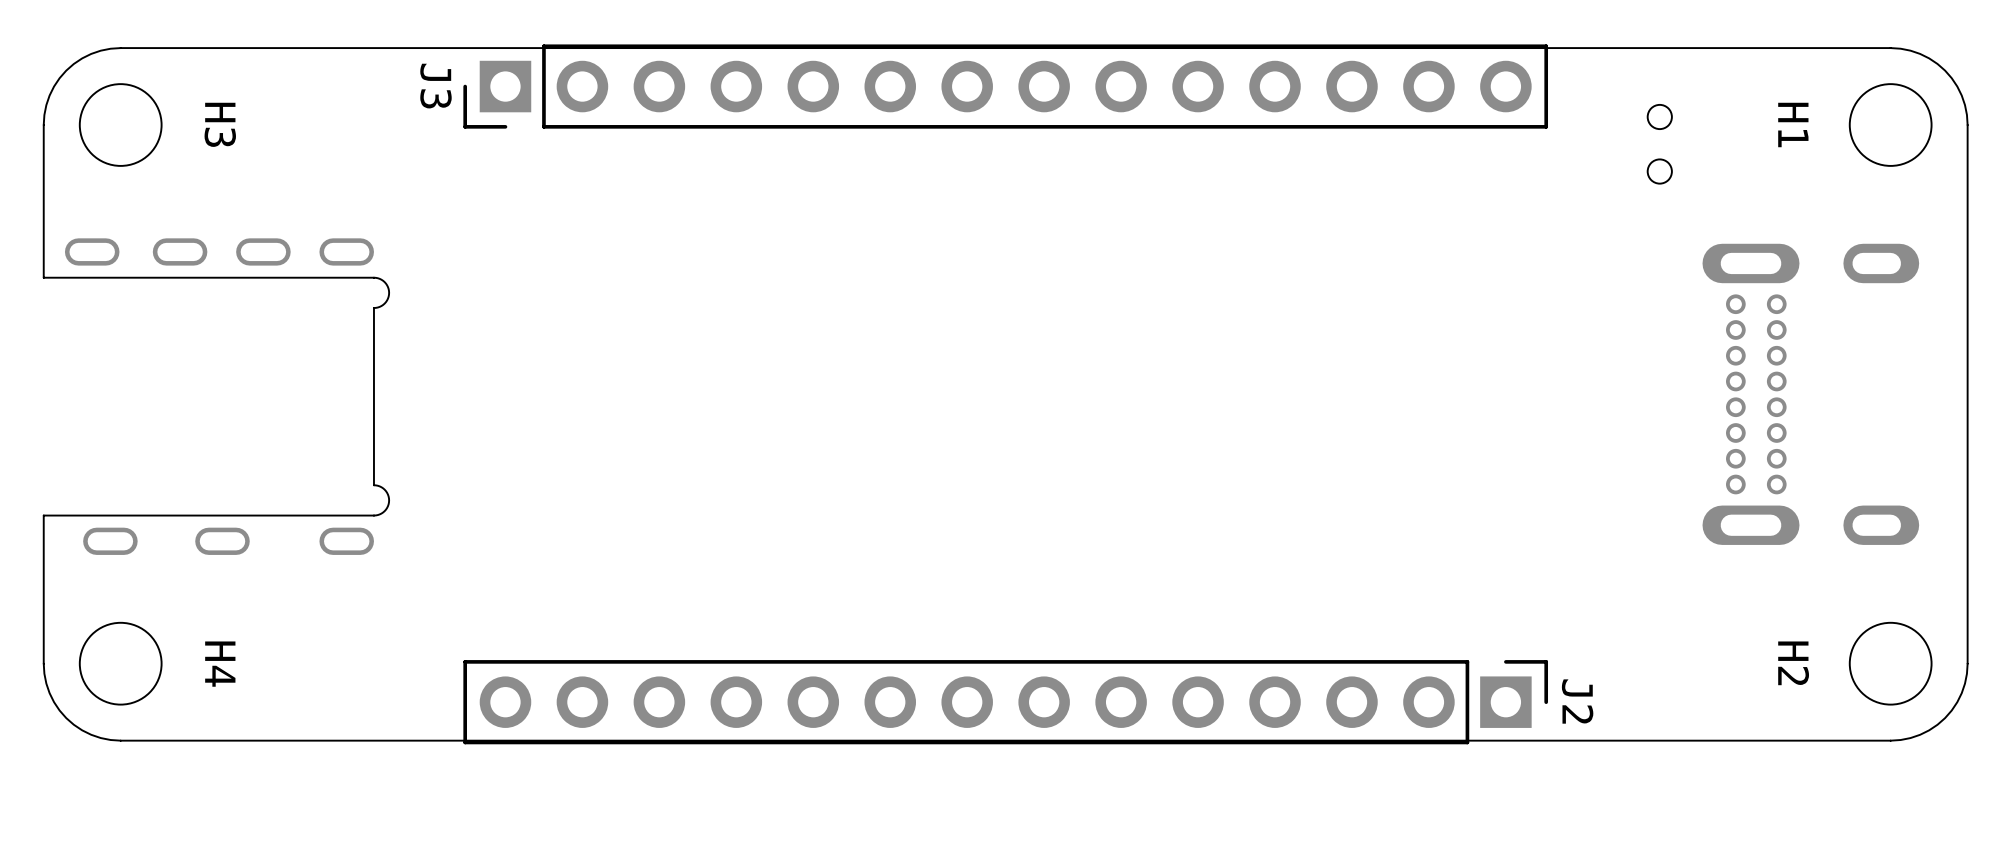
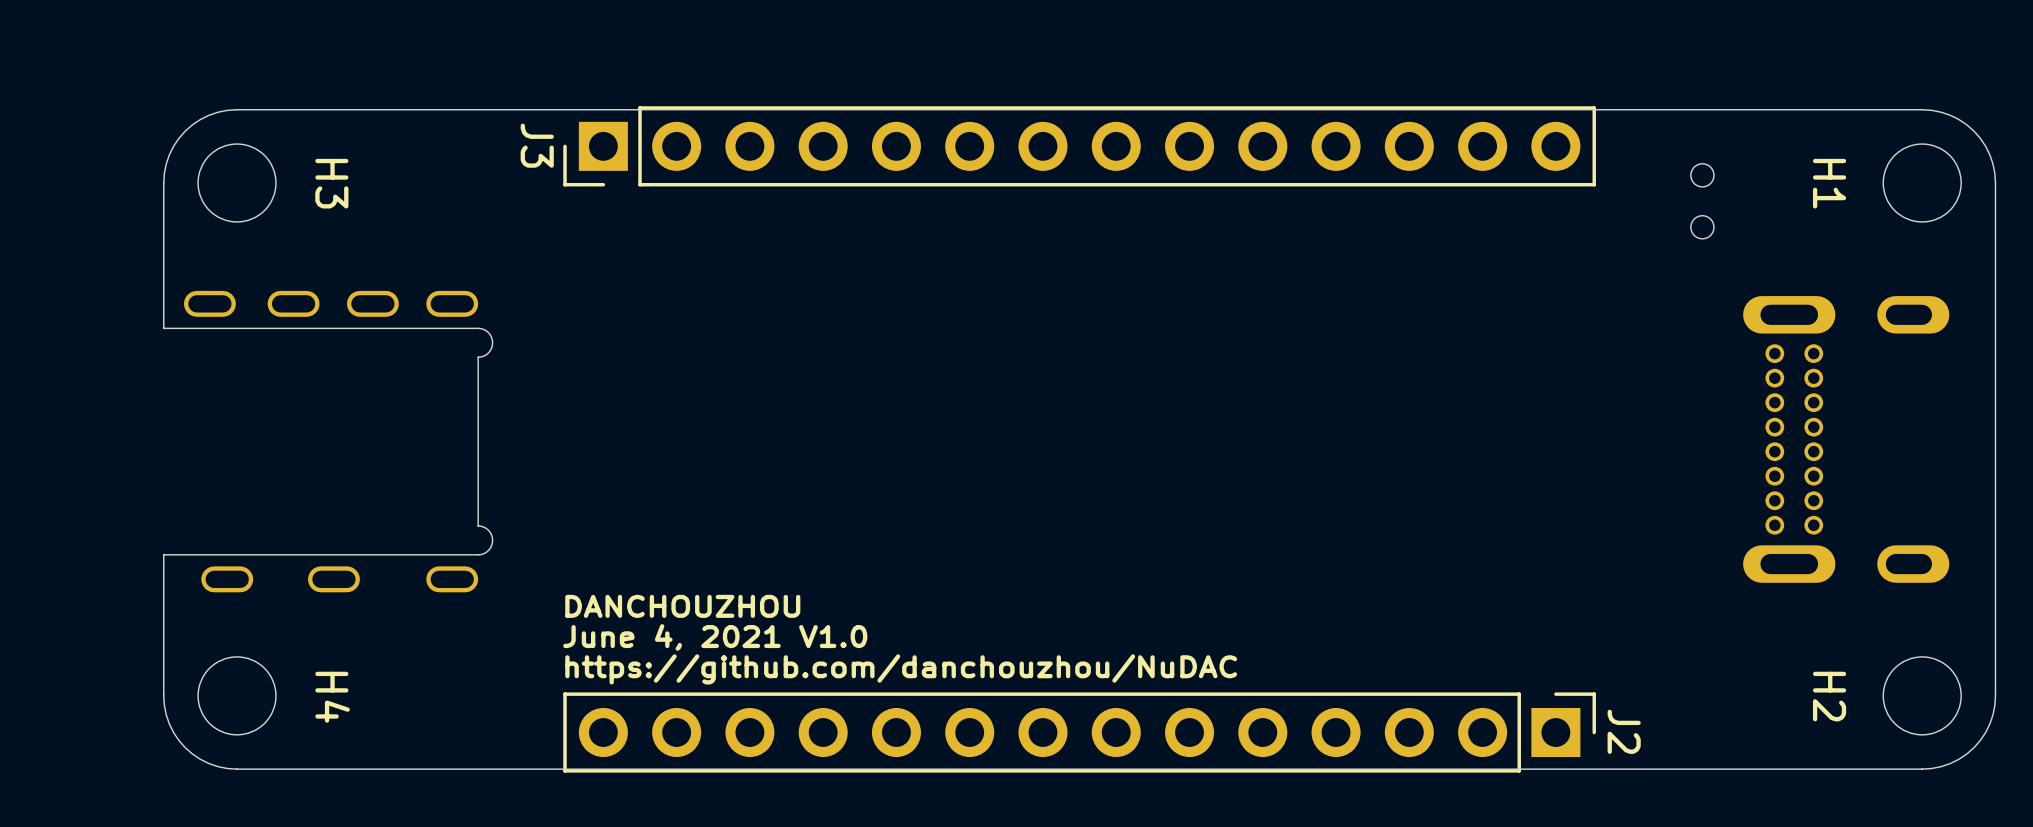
text: none -> DANCHOUZHOU (682, 606)
text: none -> June 4, 2021 V1.0 (715, 637)
text: none -> https://github.com/danchouzhou/NuDAC (901, 669)

